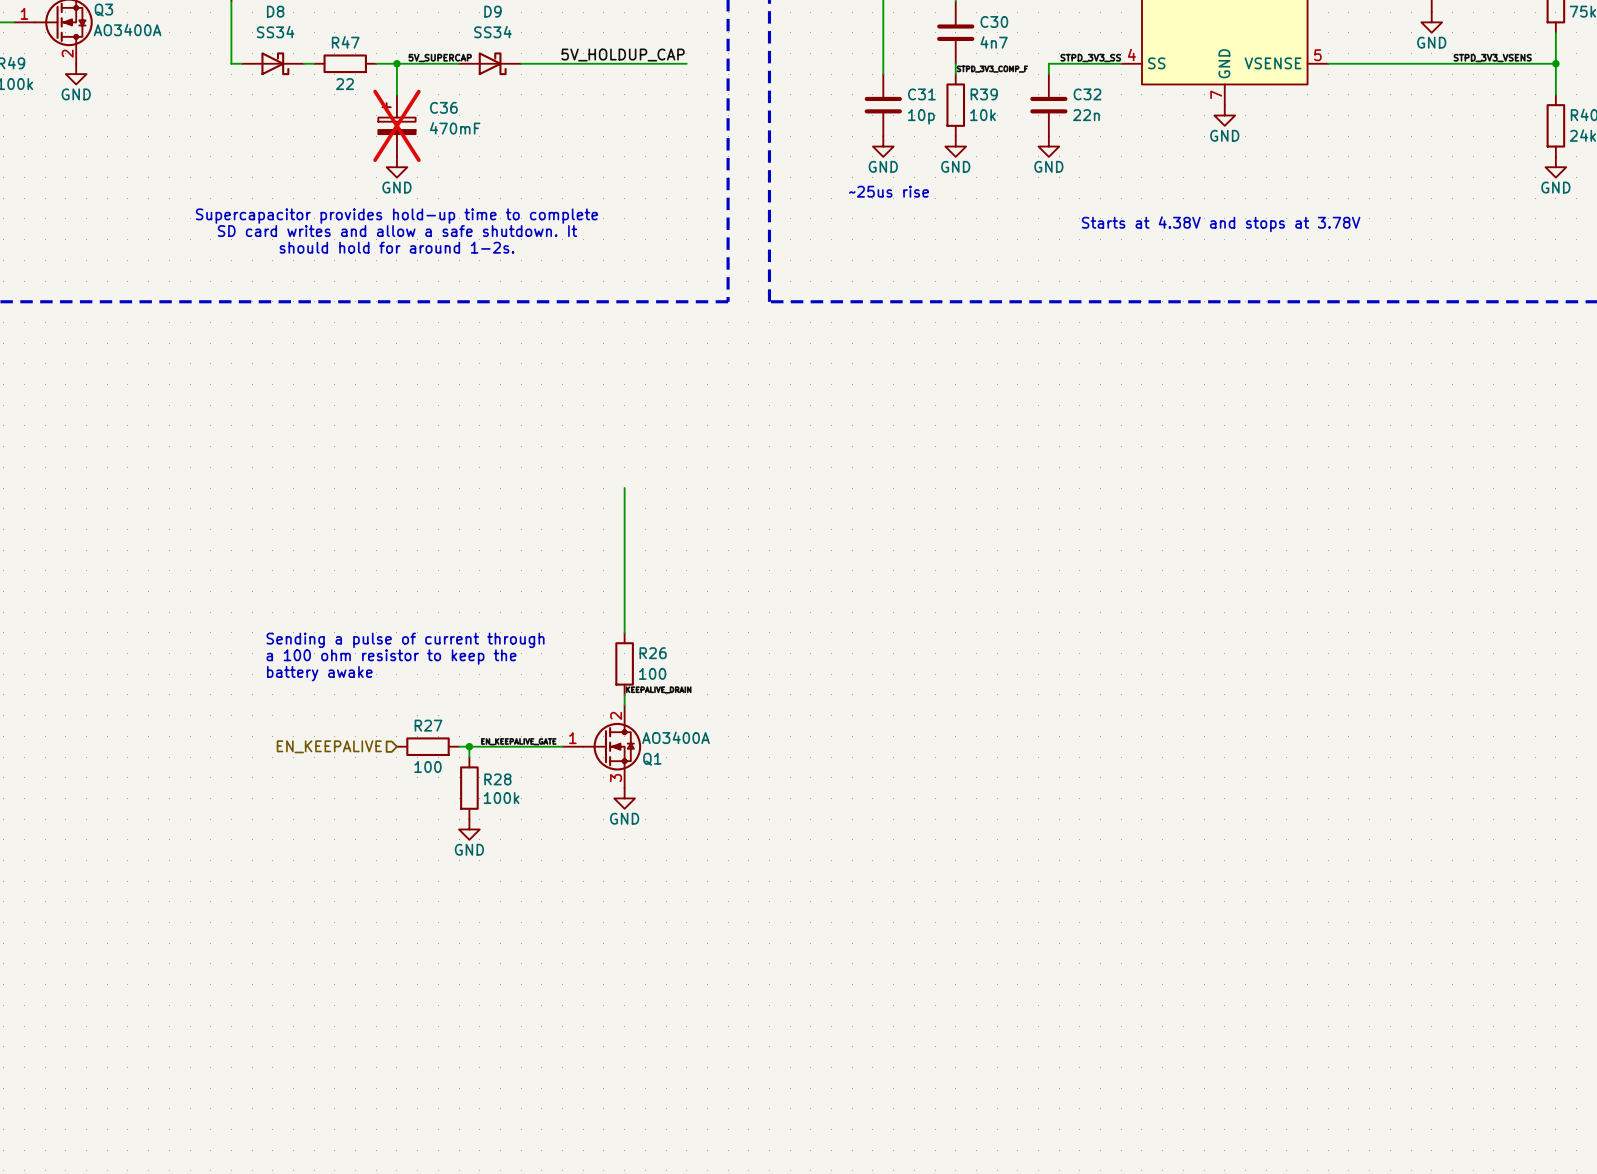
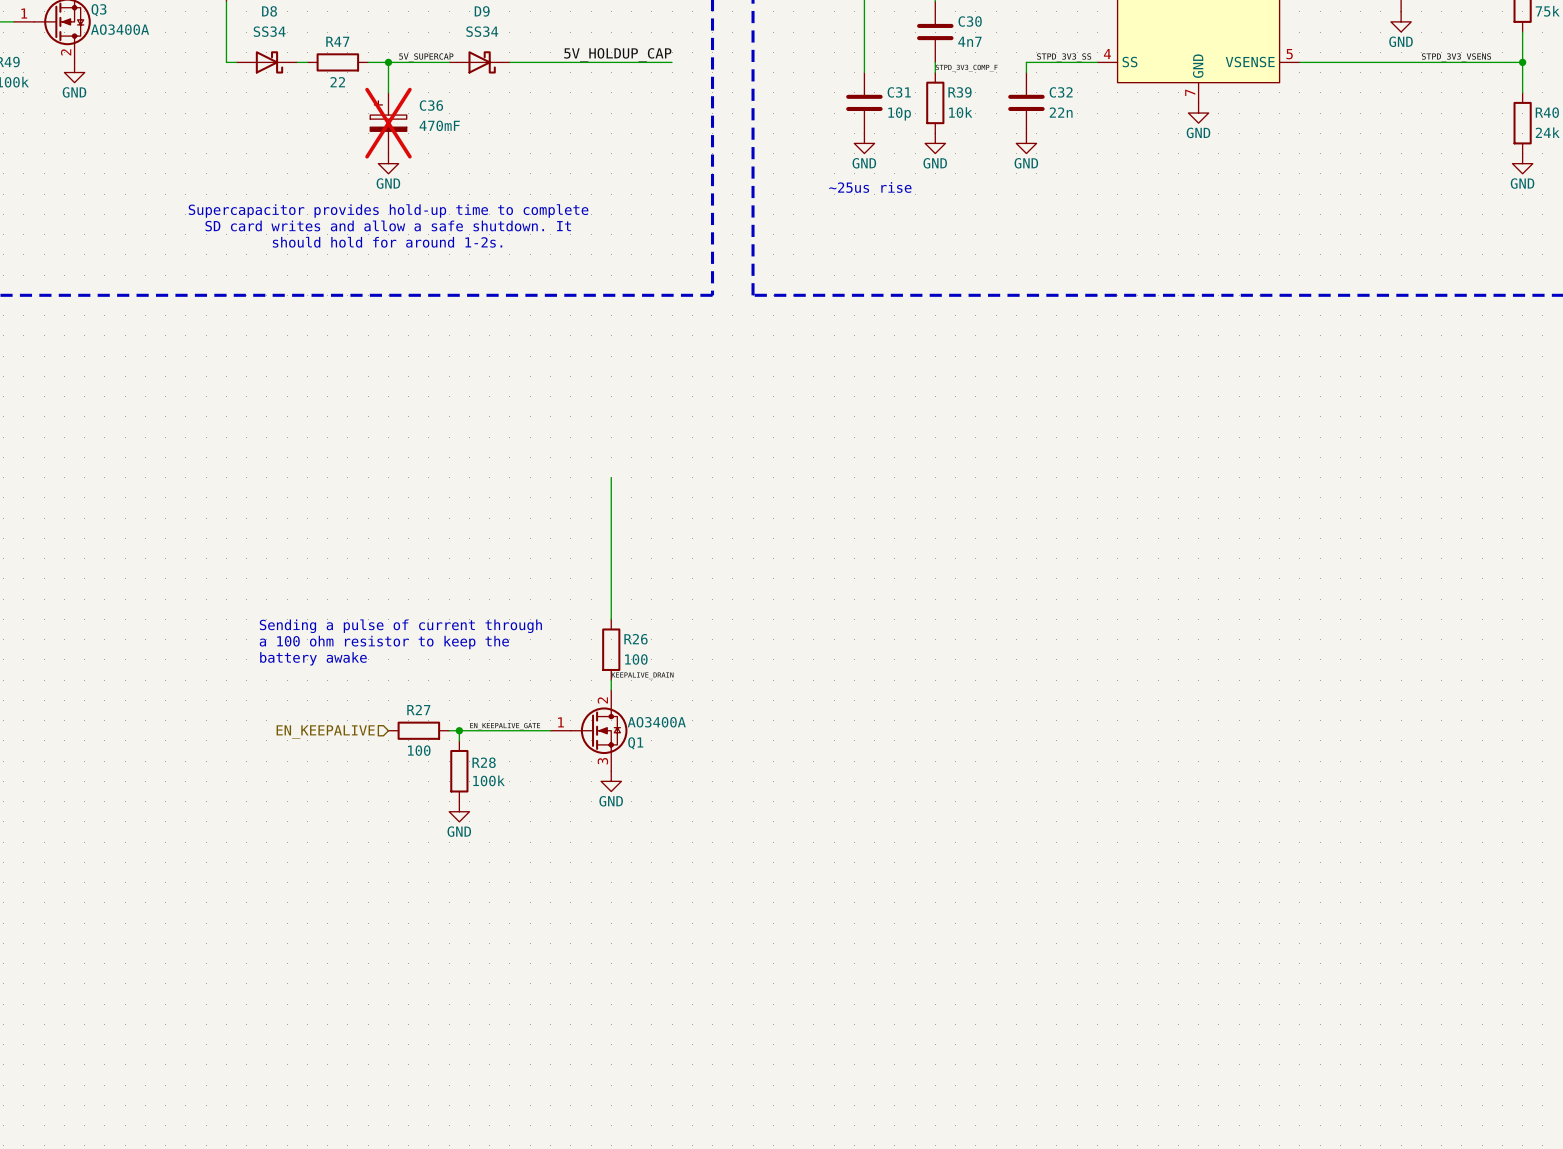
text: Starts at 4.38V and stops at 3.78V (1221, 224) -> none

